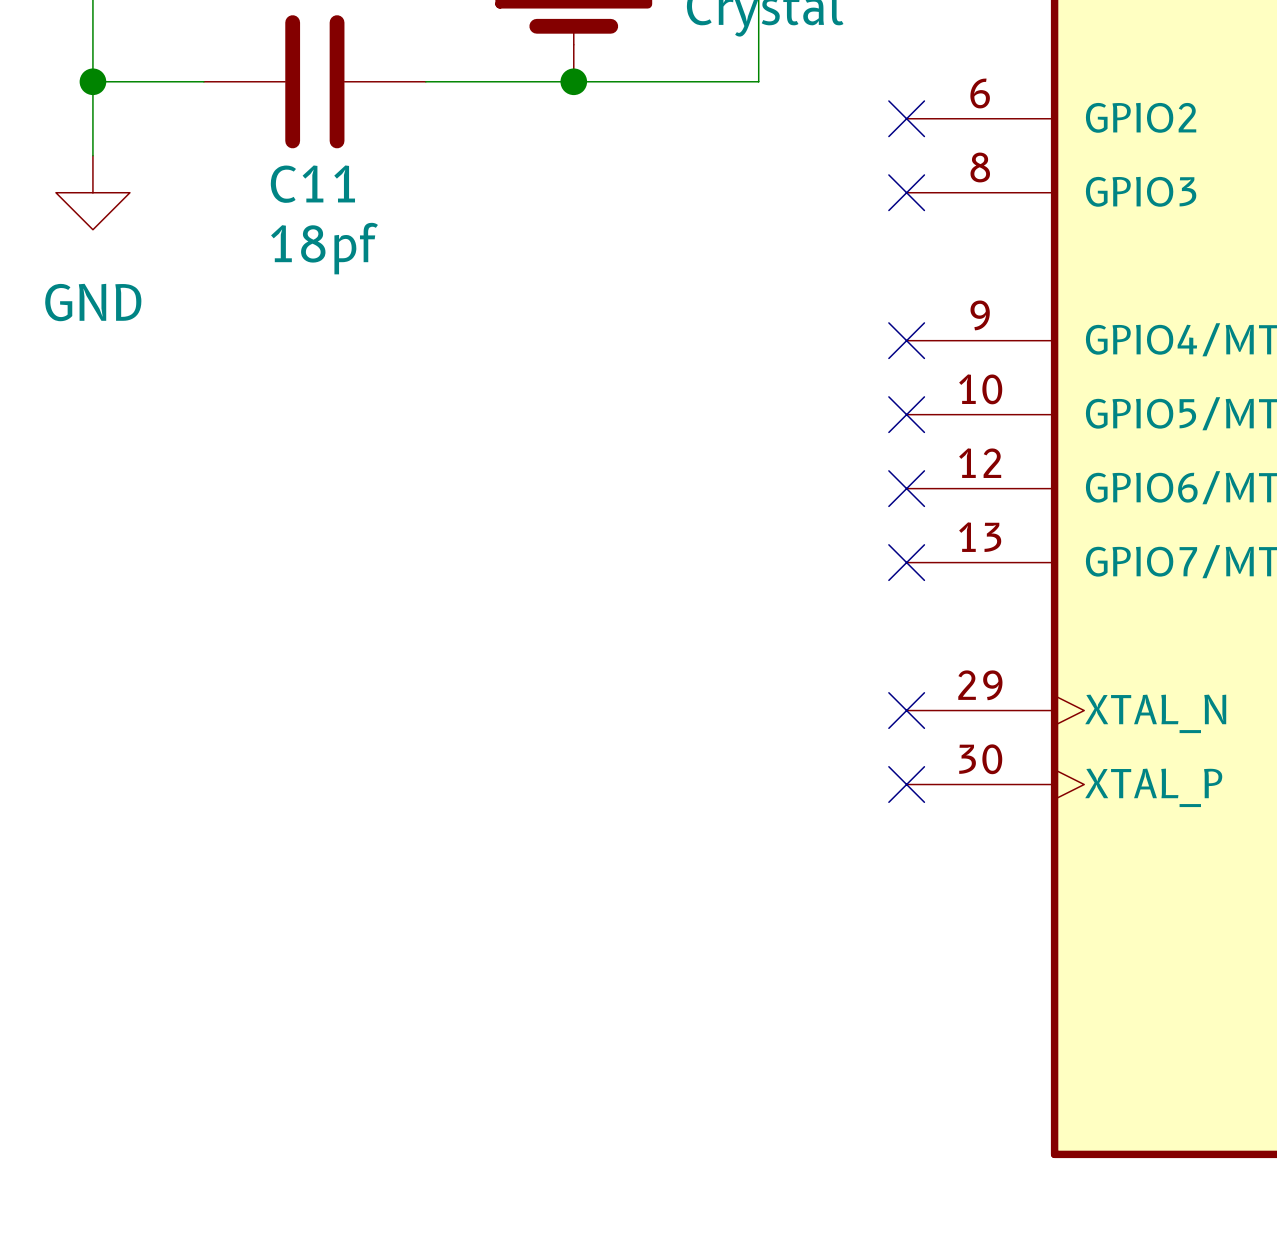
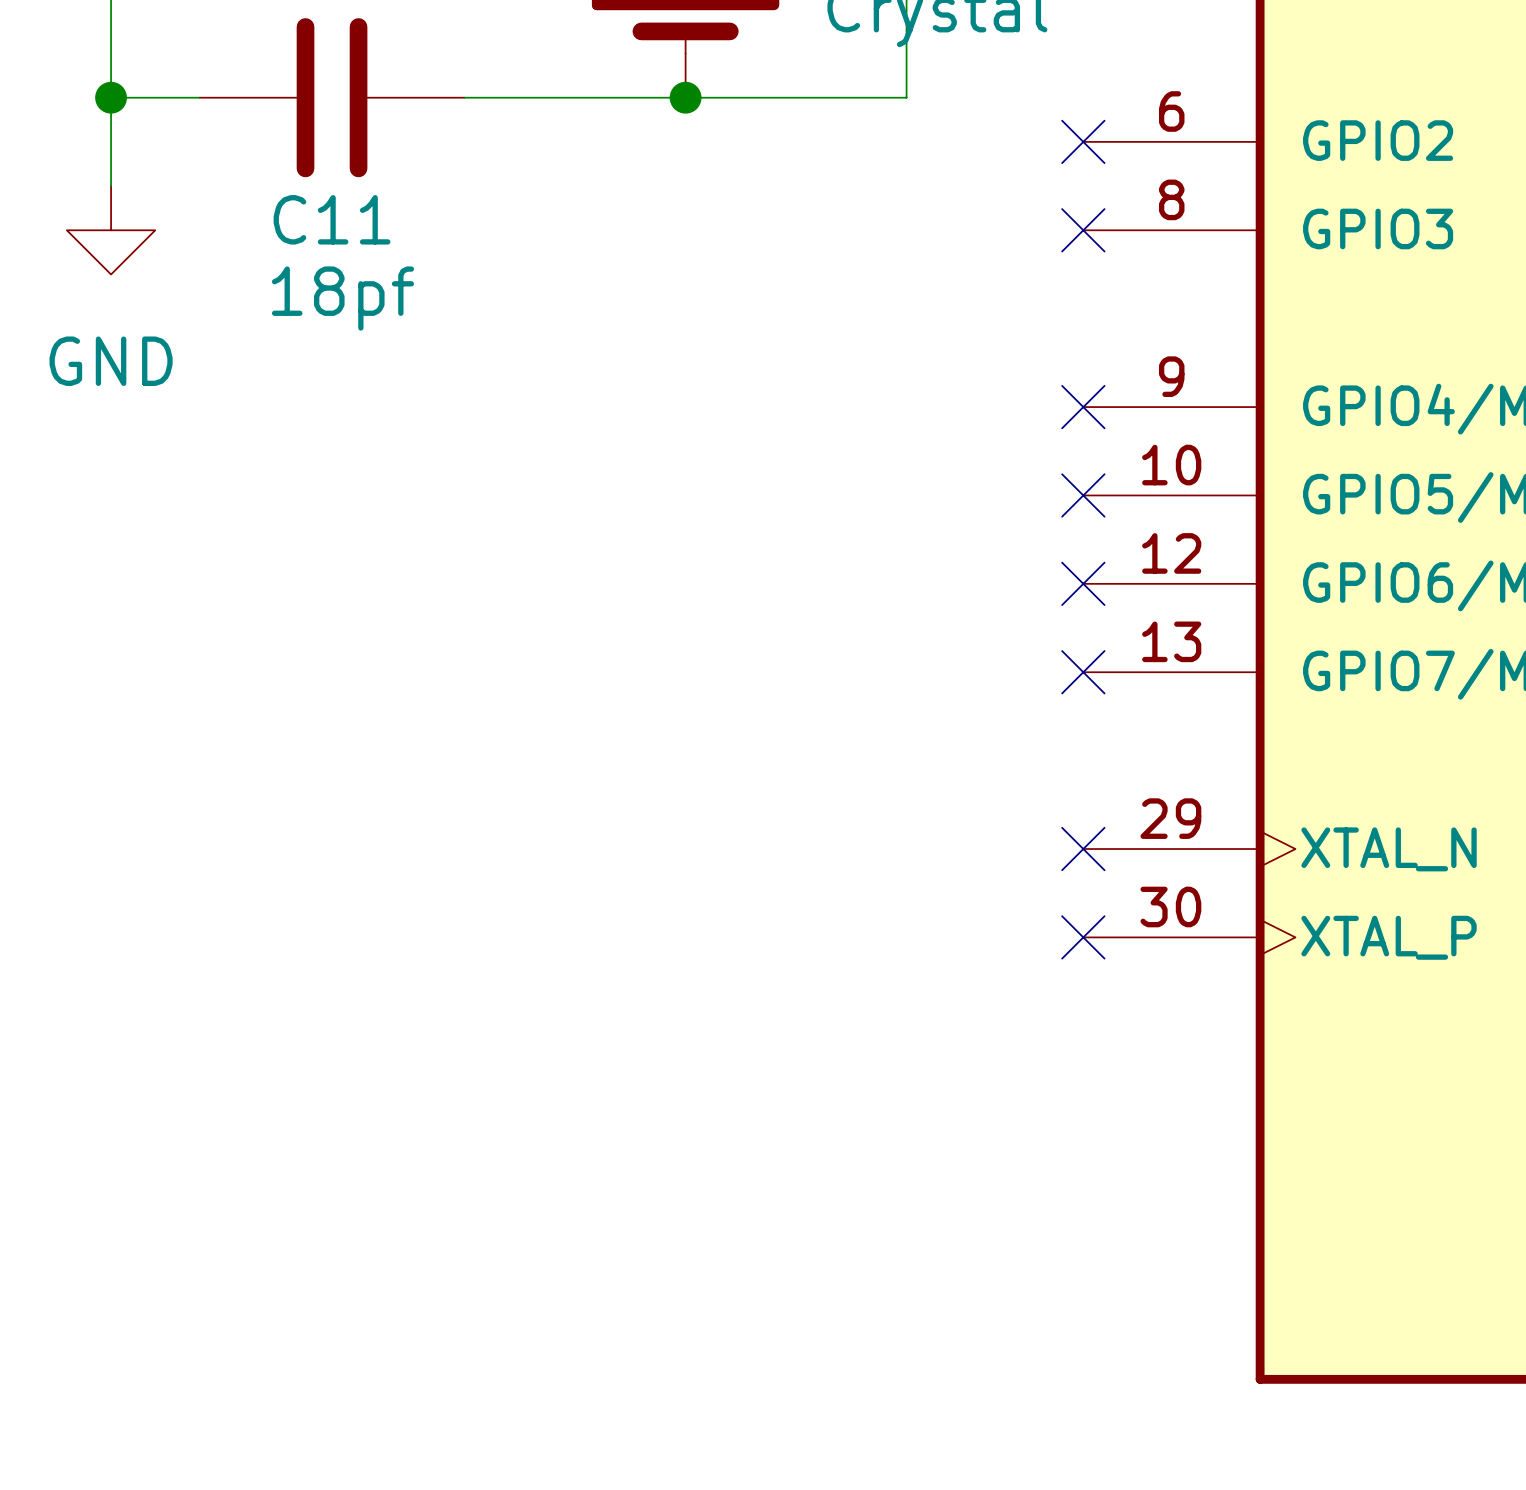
C11 position: (314, 81) -> (332, 97)

